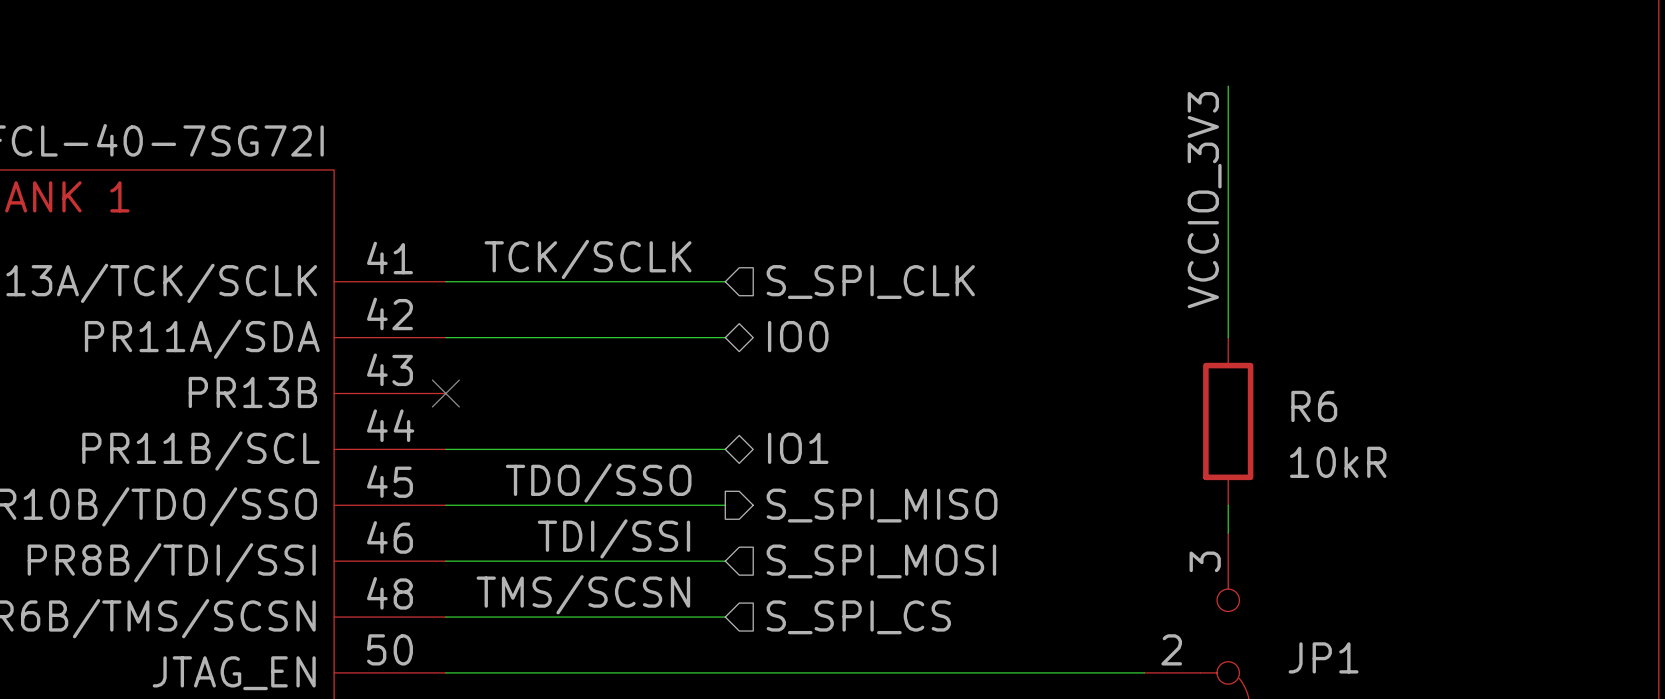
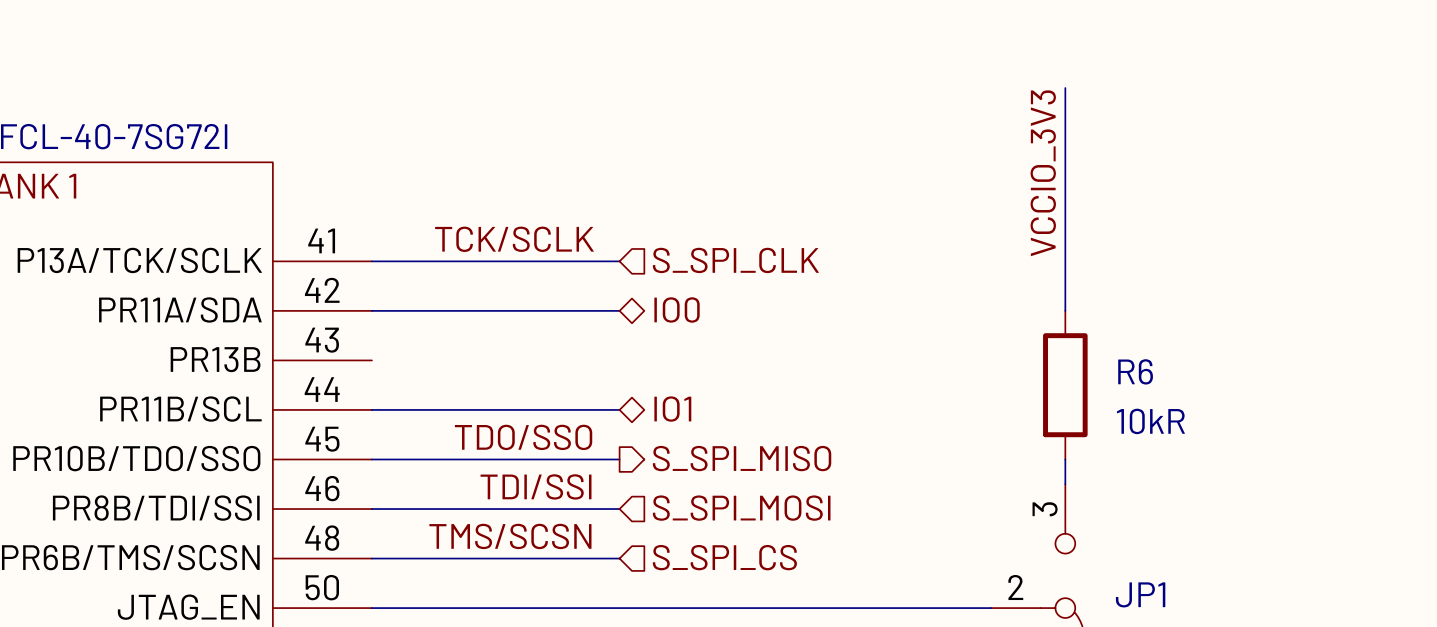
no-connect mark: (445, 393) -> none

